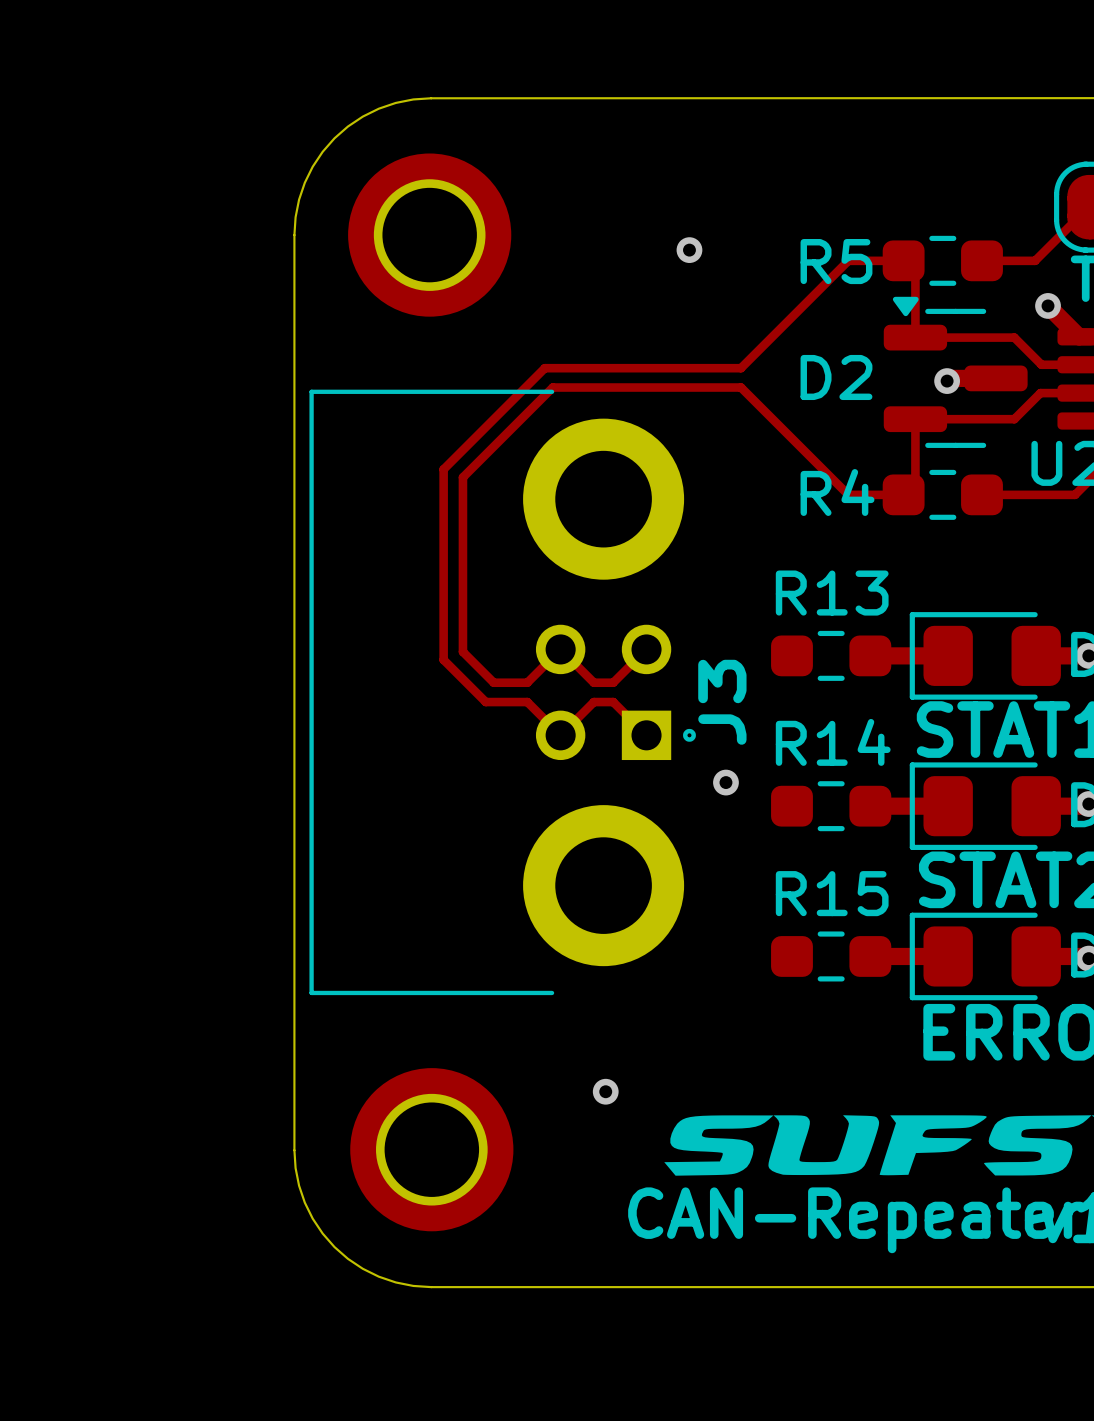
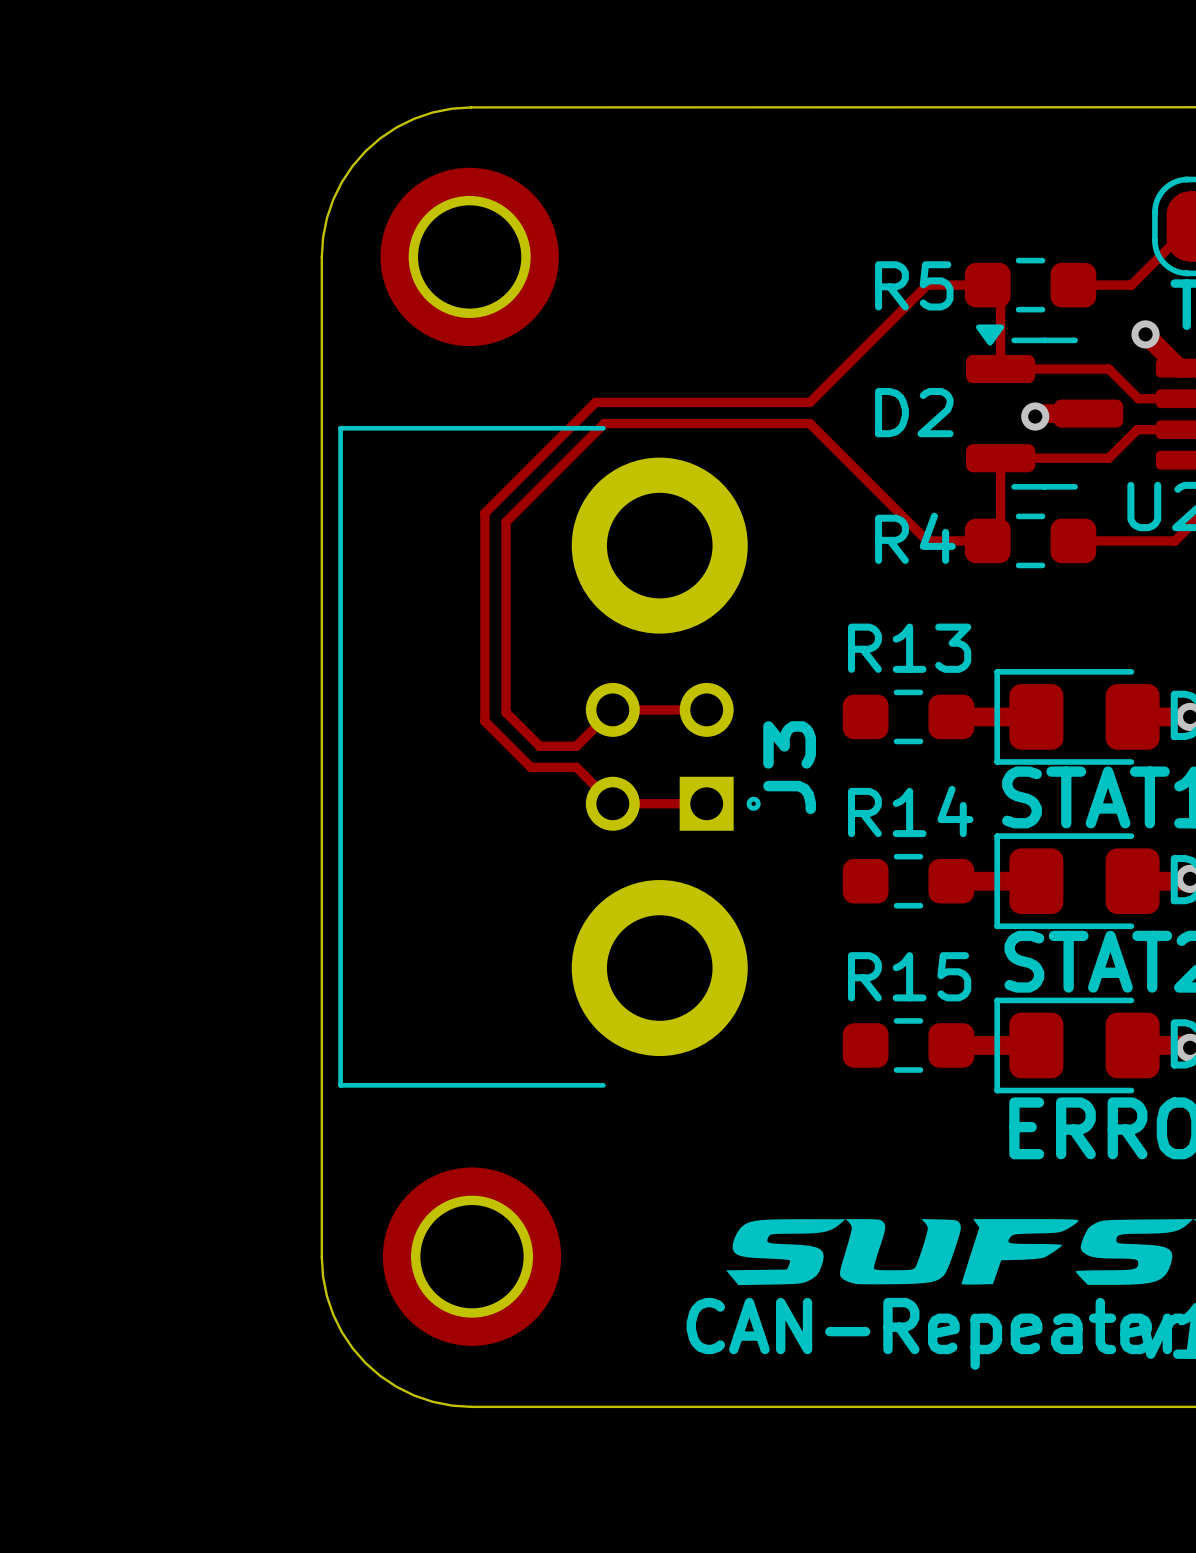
via: (689, 250) -> none
track: (560, 649) (593, 682) (613, 682) (646, 649) -> (612, 709) (706, 709)
track: (560, 735) (593, 702) (613, 702) (646, 735) -> (612, 803) (706, 803)
via: (725, 782) -> none
via: (605, 1091) -> none

